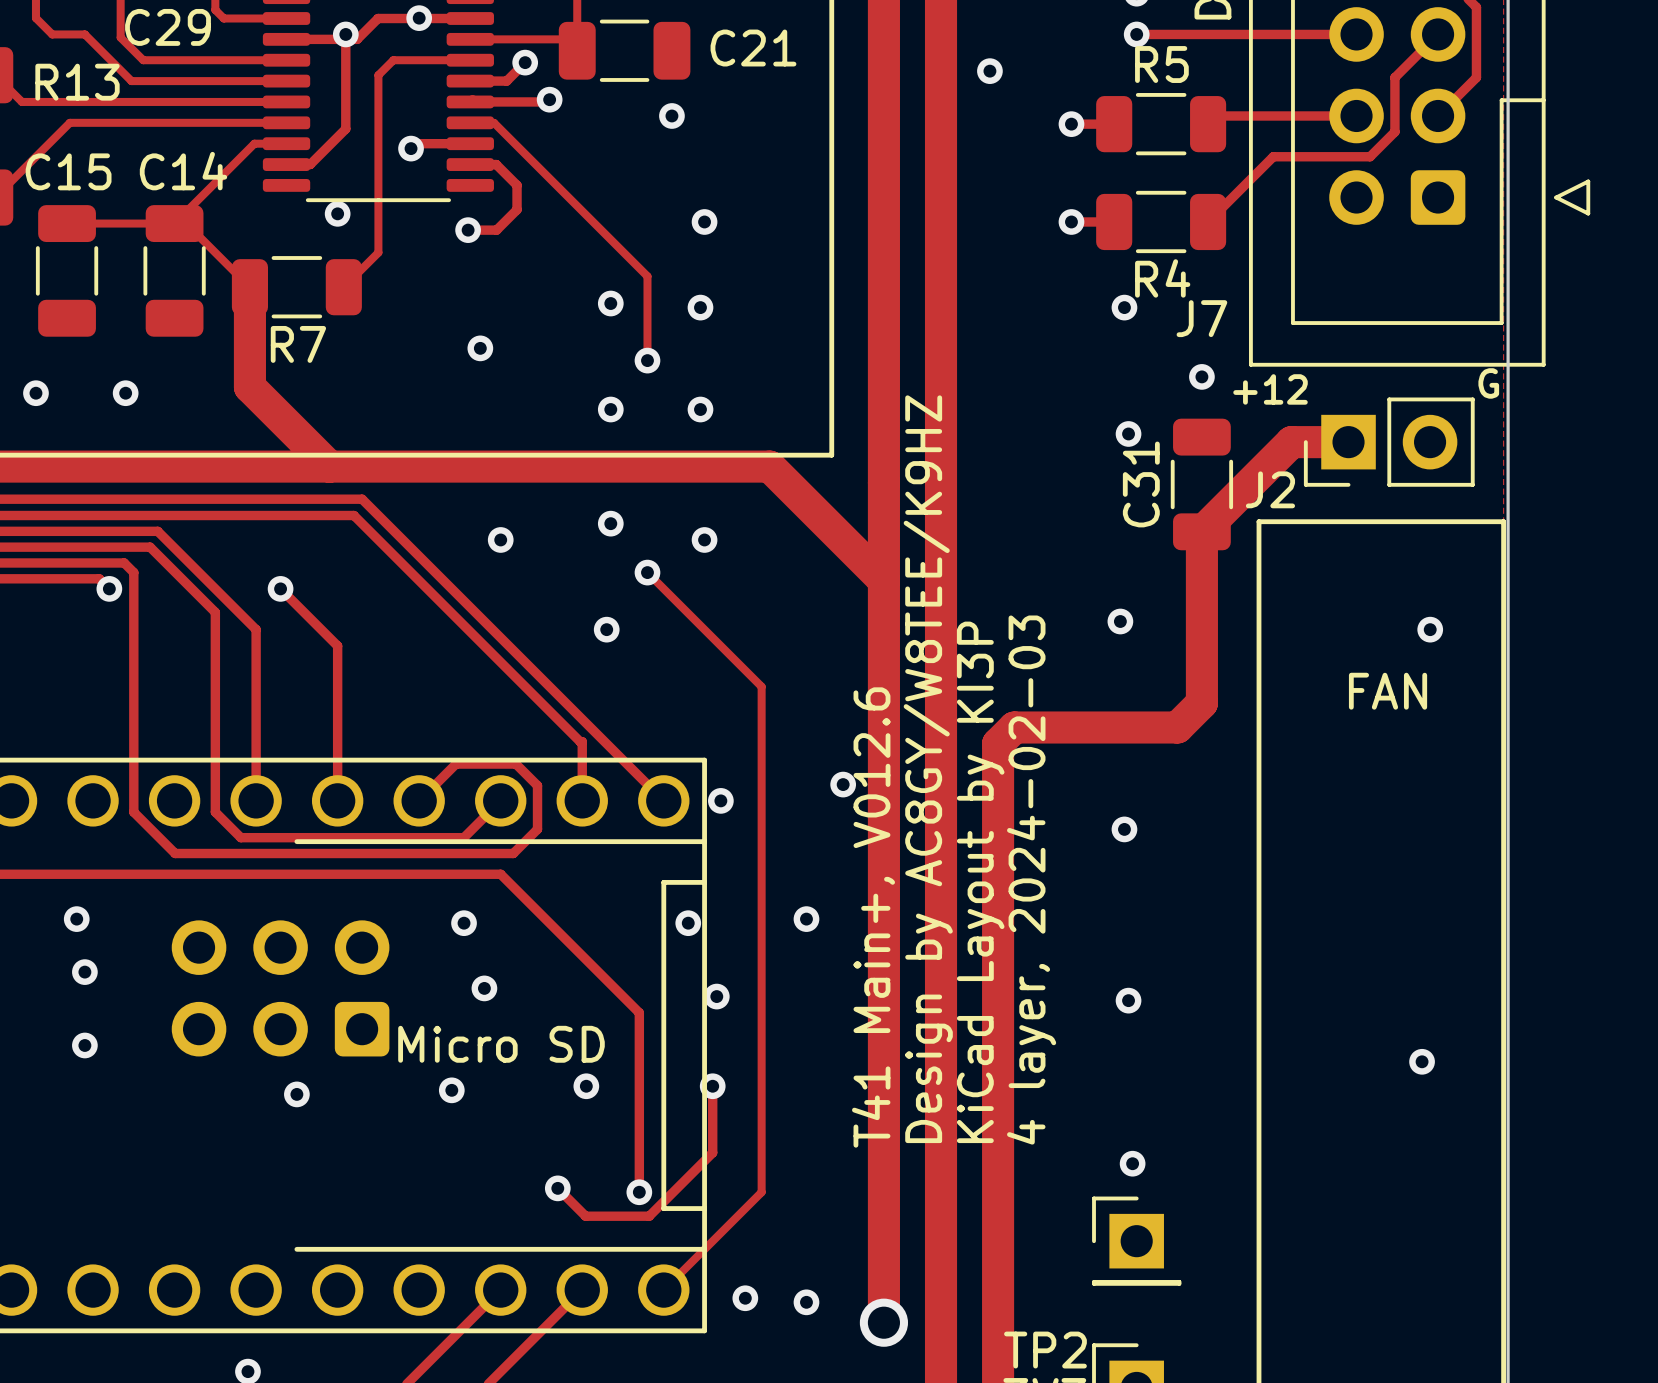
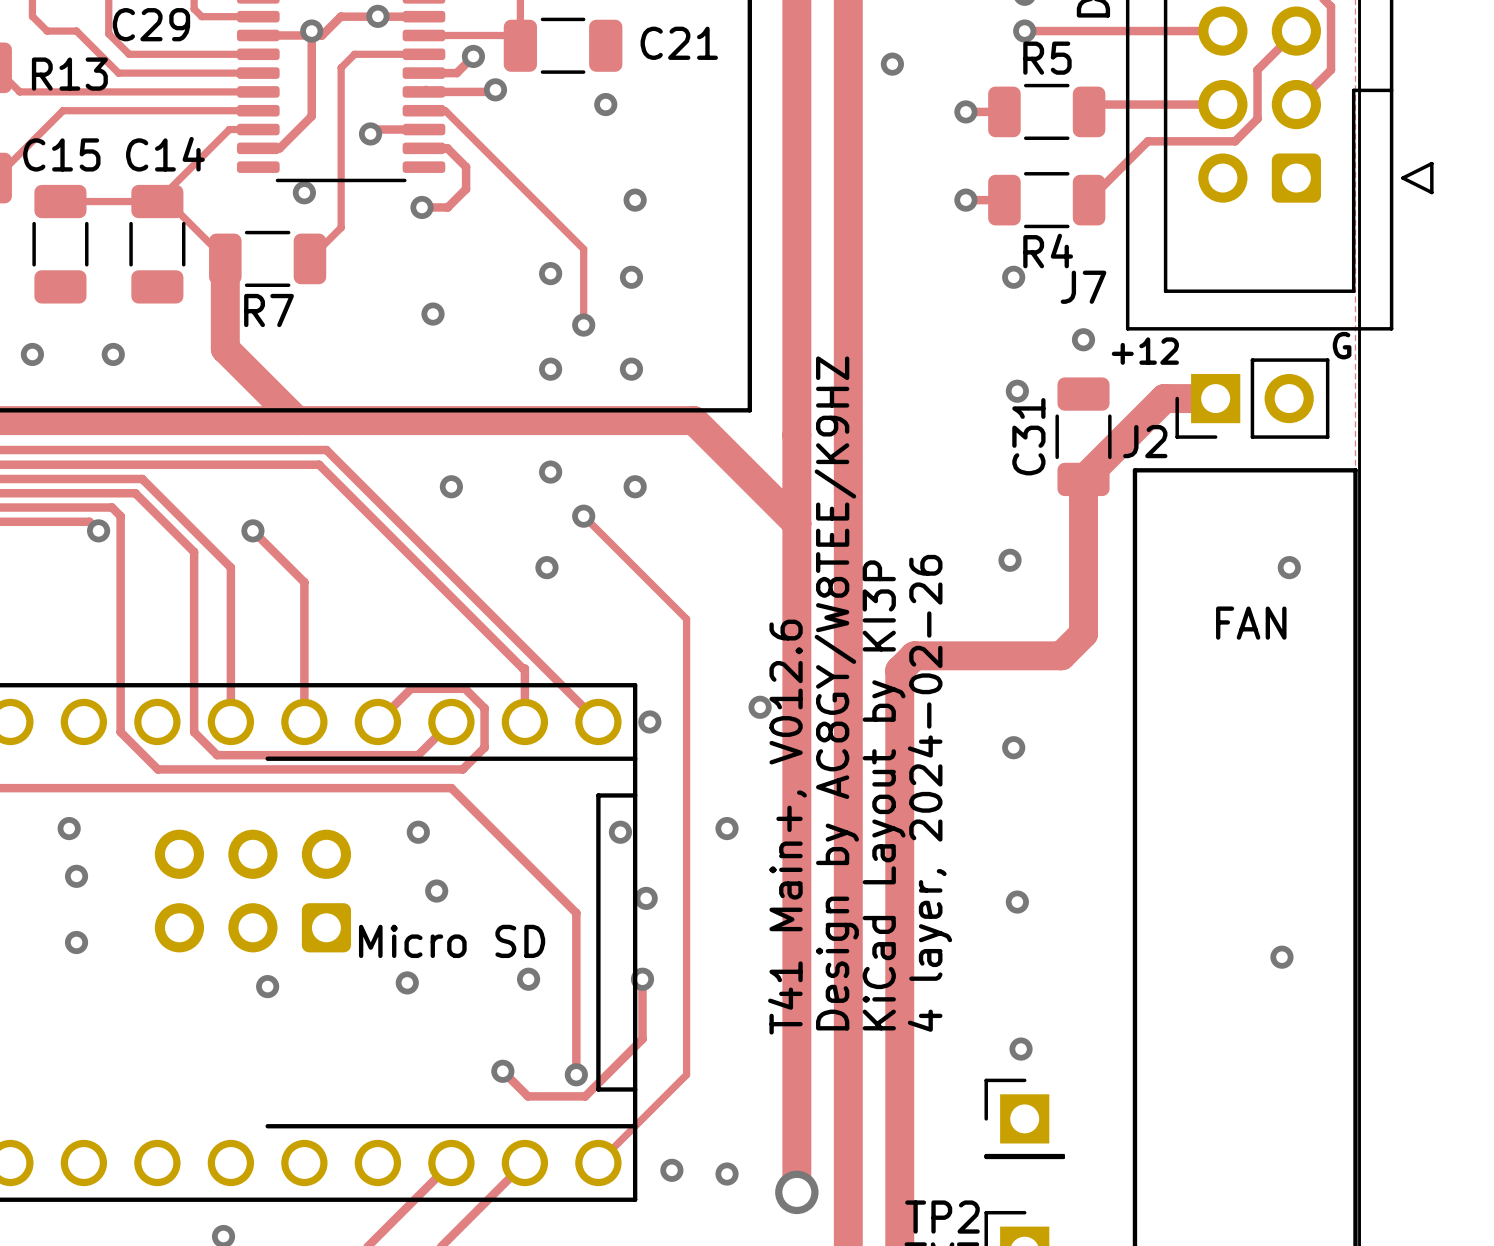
text: 4 layer, 2024-02-03 (1031, 880) -> 4 layer, 2024-02-26 (929, 793)

